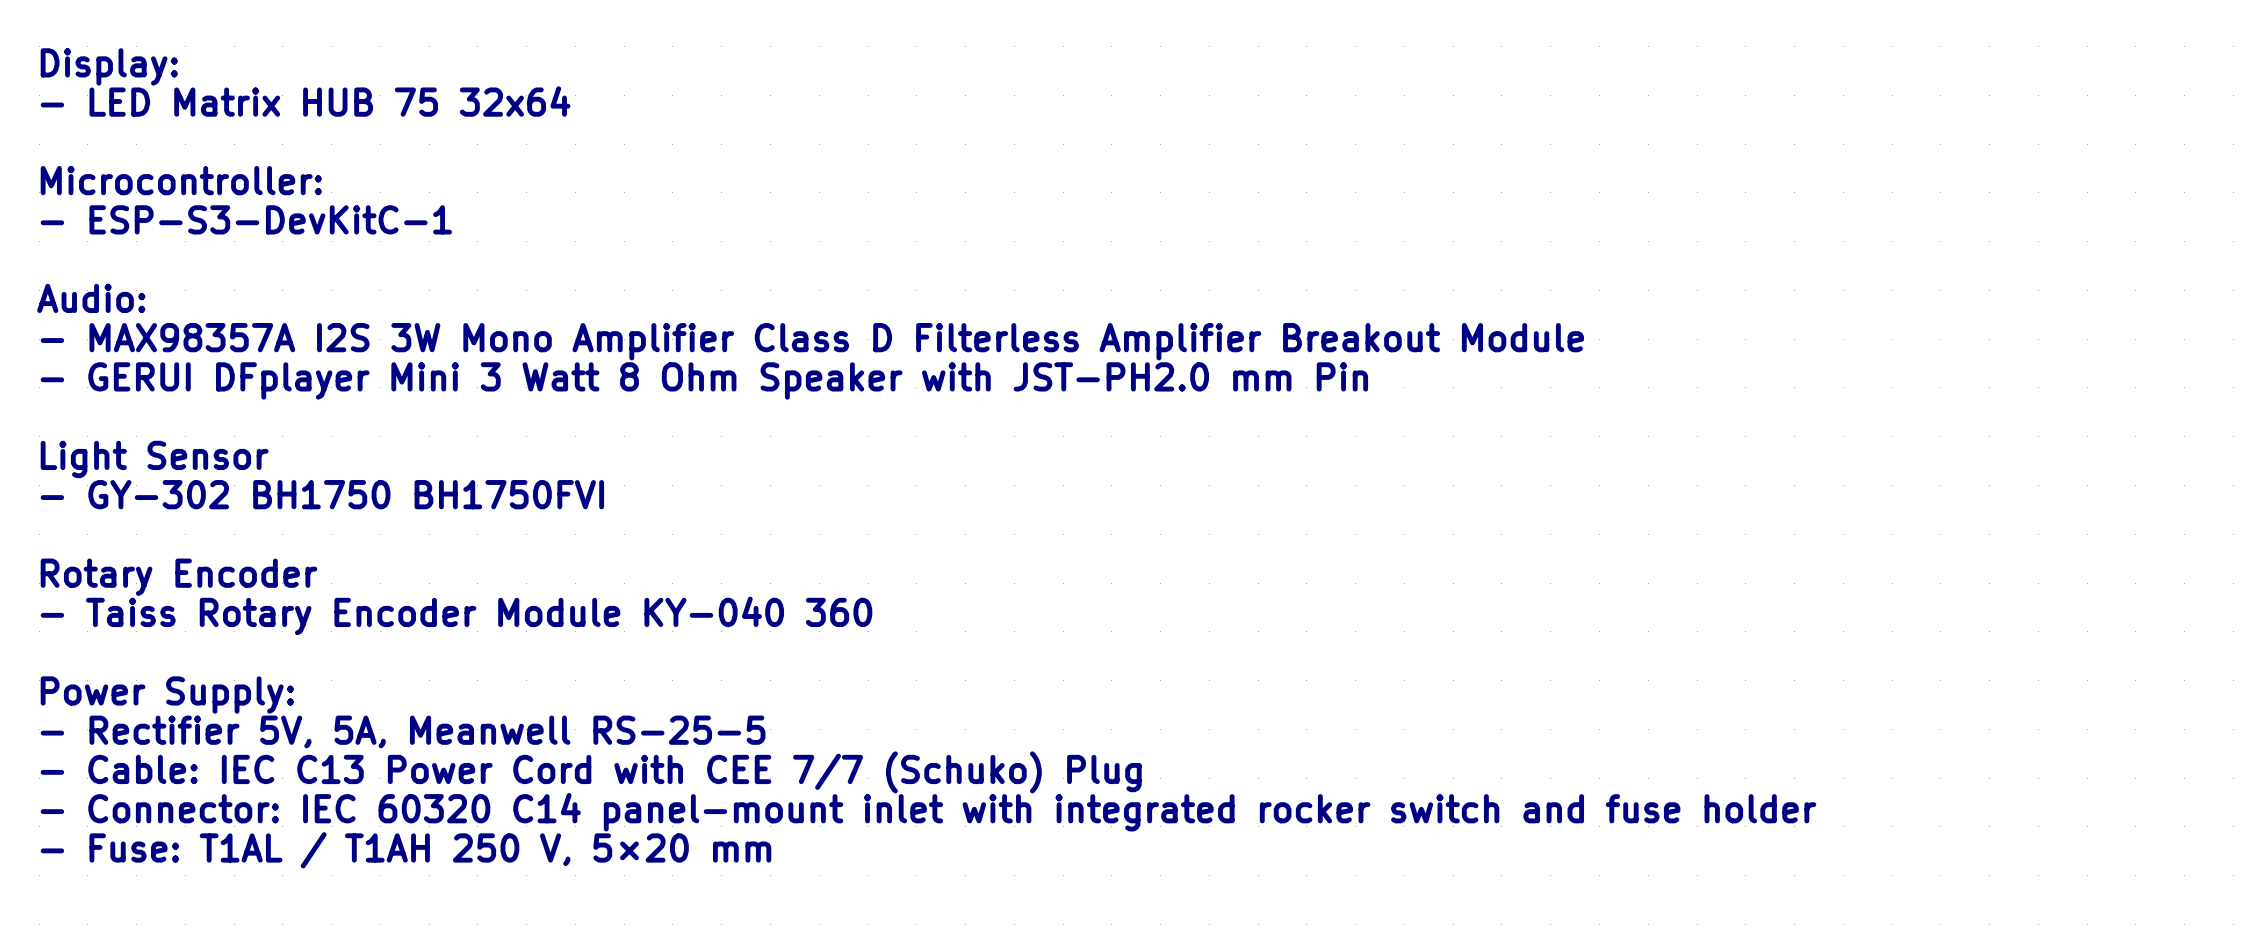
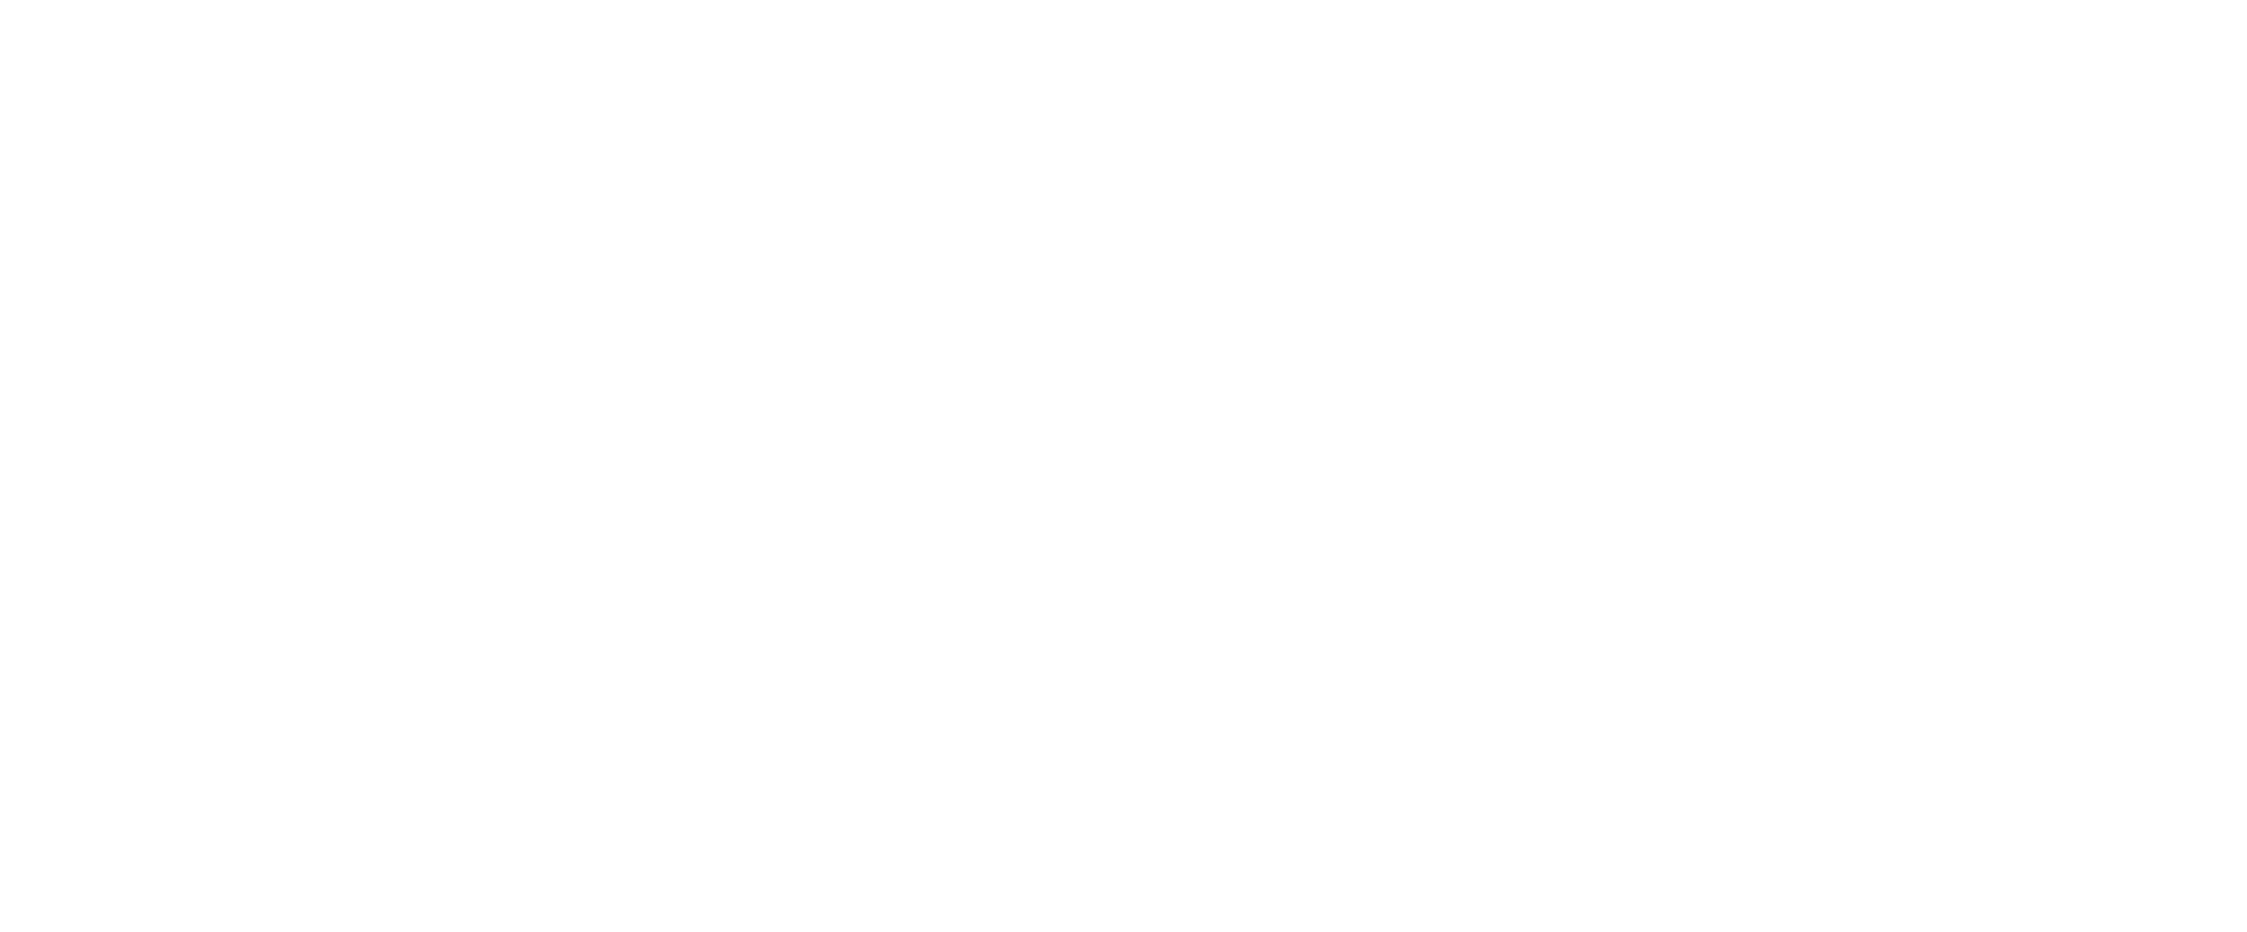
text: Display: (109, 66) -> none
text: - LED Matrix HUB 75 32x64 (305, 101) -> none
text: Microcontroller: (181, 180) -> none
text: - ESP-S3-DevKitC-1 (246, 219) -> none
text: Audio: (91, 298) -> none
text: - MAX98357A I2S 3W Mono Amplifier Class D Filterless Amplifier Breakout Module (812, 341) -> none
text: - GERUI DFplayer Mini 3 Watt 8 Ohm Speaker with JST-PH2.0 mm Pin (704, 380) -> none
text: Light Sensor (154, 459) -> none
text: - GY-302 BH1750 BH1750FVI (322, 494) -> none
text: Rotary Encoder (178, 577) -> none
text: - Taiss Rotary Encoder Module KY-040 360 (456, 615) -> none
text: Power Supply: (167, 695) -> none
text: - Rectifier 5V, 5A, Meanwell RS-25-5 (403, 731) -> none
text: - Cable: IEC C13 Power Cord with CEE 7/7 (Schuko) Plug (591, 772) -> none
text: - Connector: IEC 60320 C14 panel-mount inlet with integrated rocker switch and fuse holder (928, 812) -> none
text: - Fuse: T1AL / T1AH 250 V, 5×20 mm (405, 850) -> none

